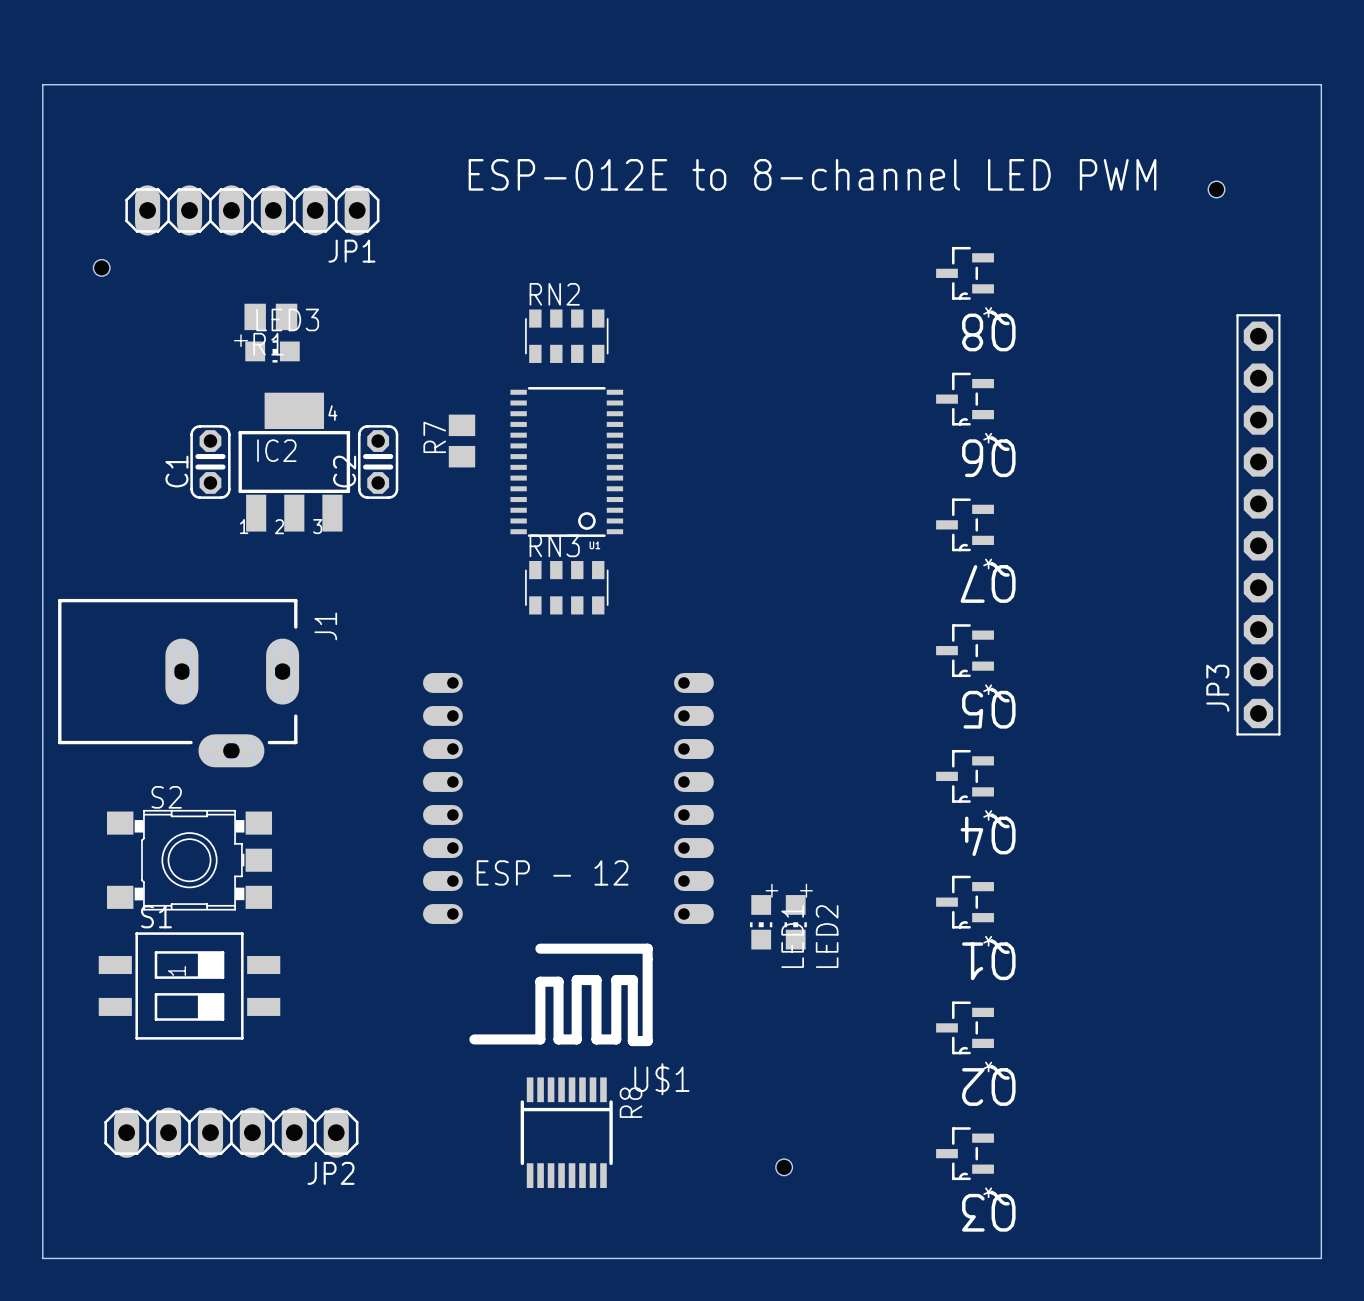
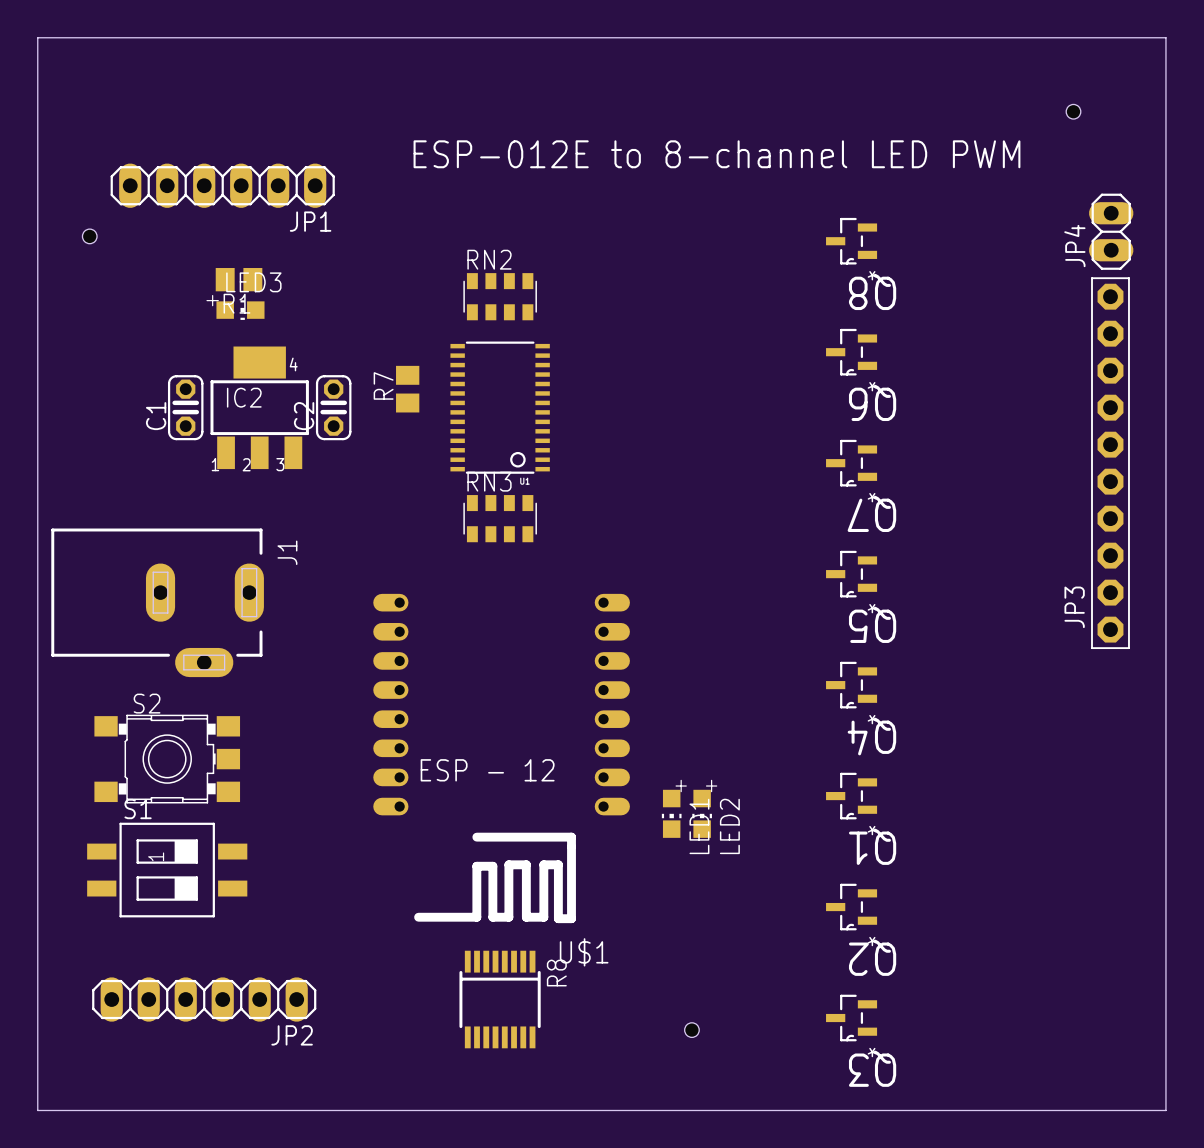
board edge: (42, 84) (1321, 84) -> (37, 74) (37, 37) (1165, 37) (1165, 74)
hole position: (1216, 189) -> (1073, 111)
JP4: none -> (1111, 231)

